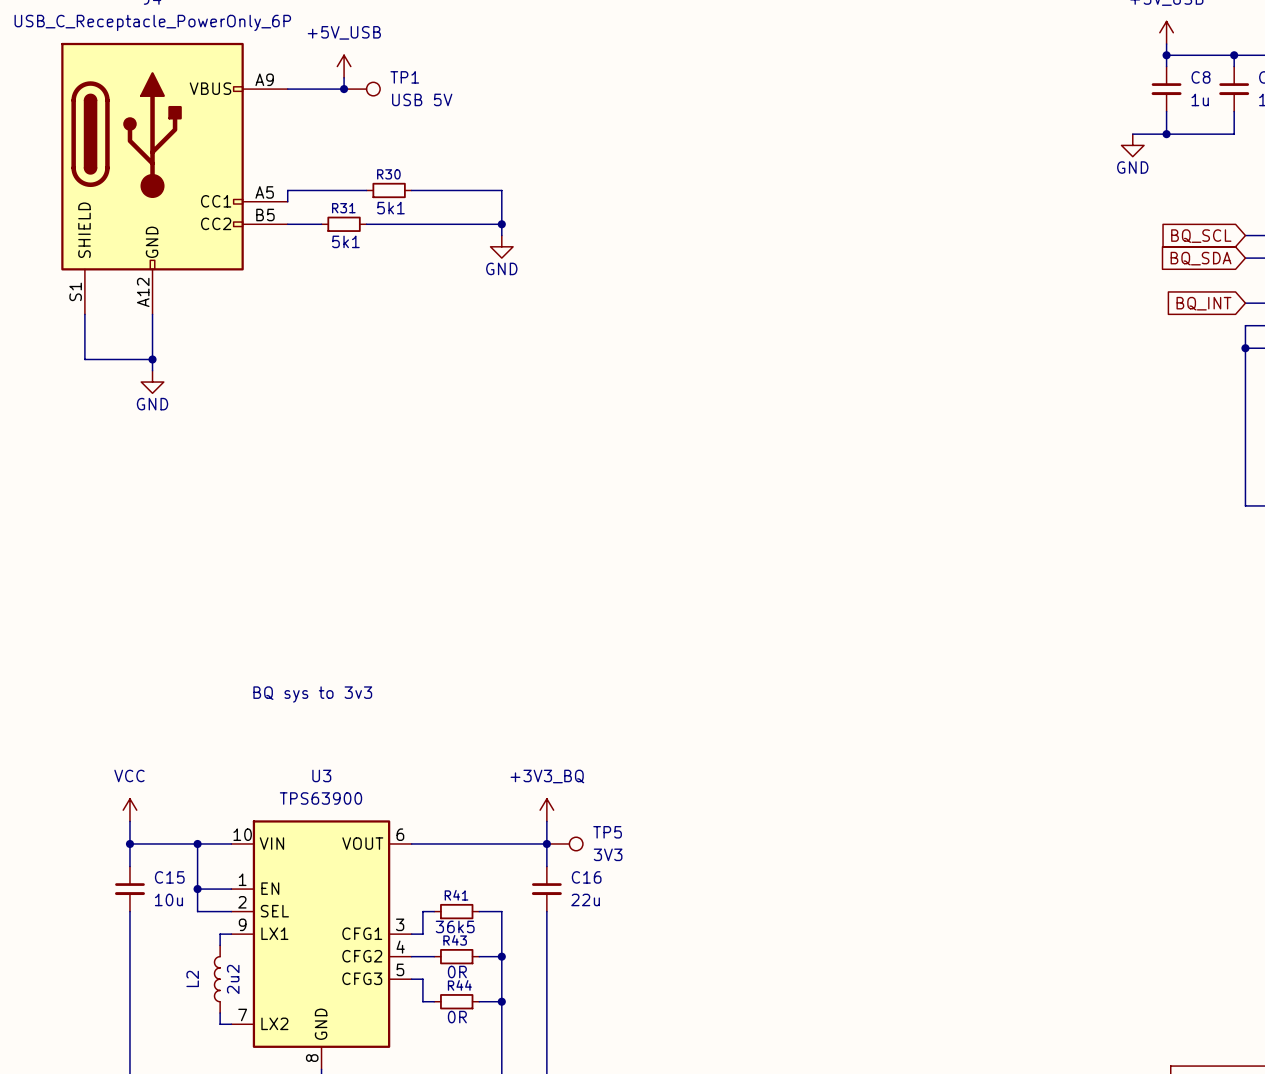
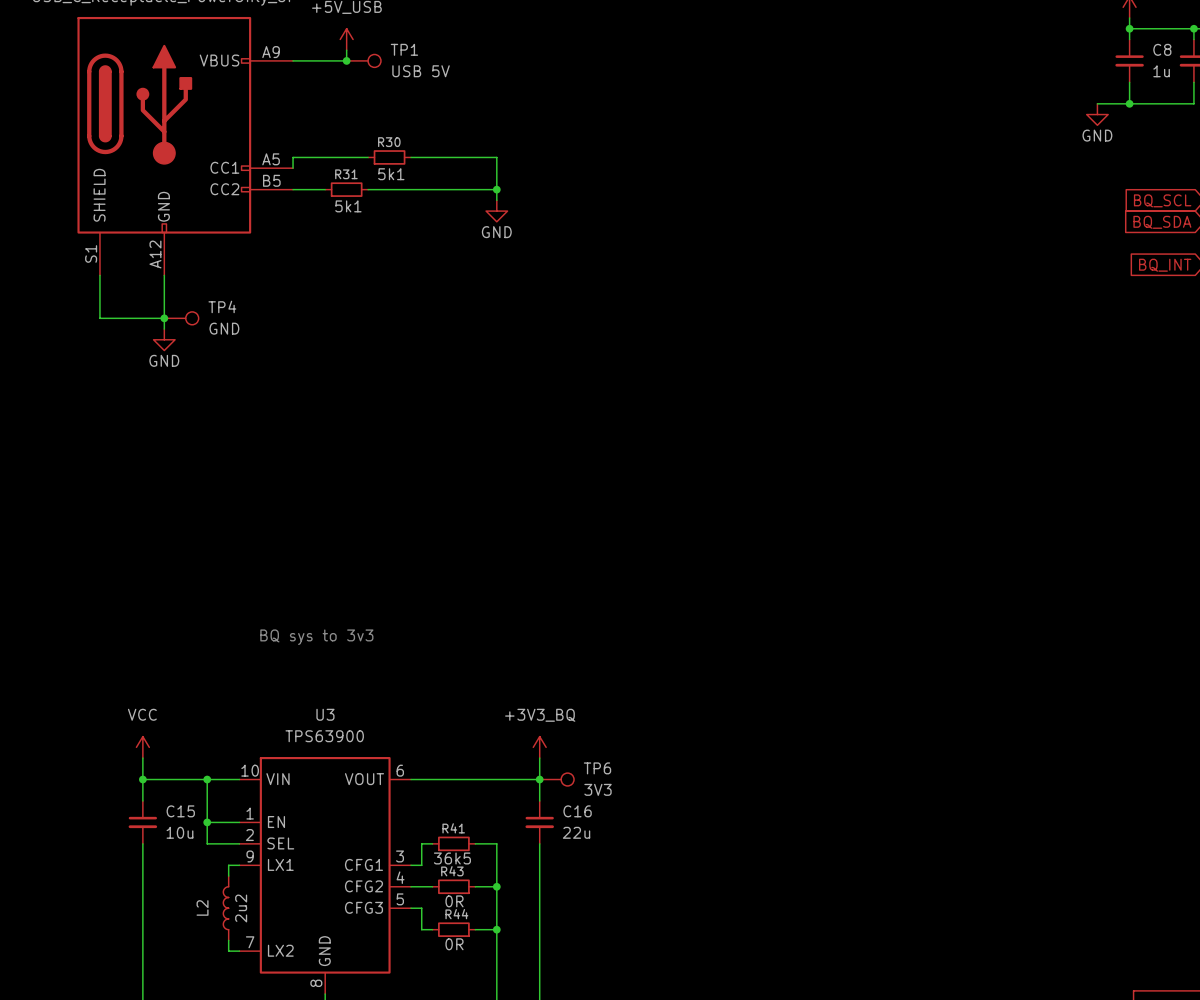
TP4: none -> GND (181, 318)
TP5 name: TP5 (607, 832) -> TP6 (597, 768)

